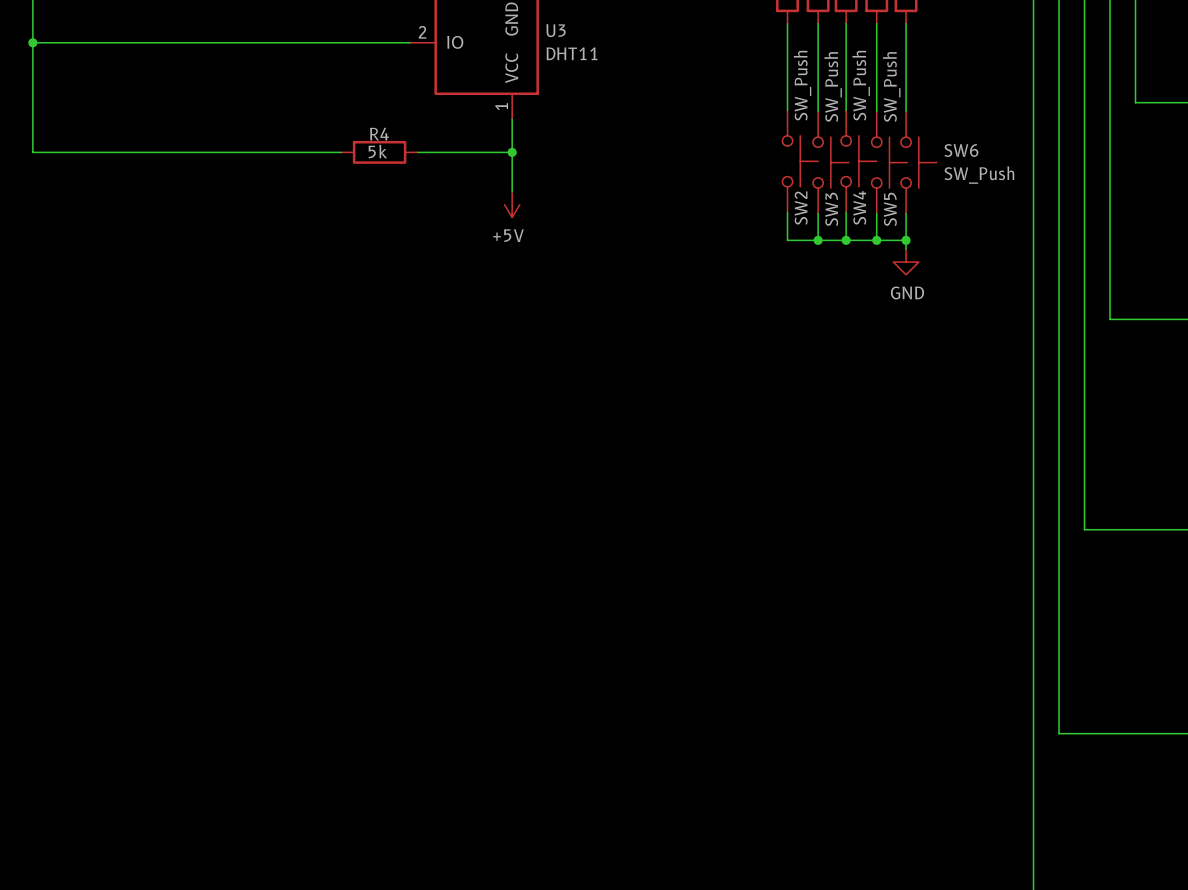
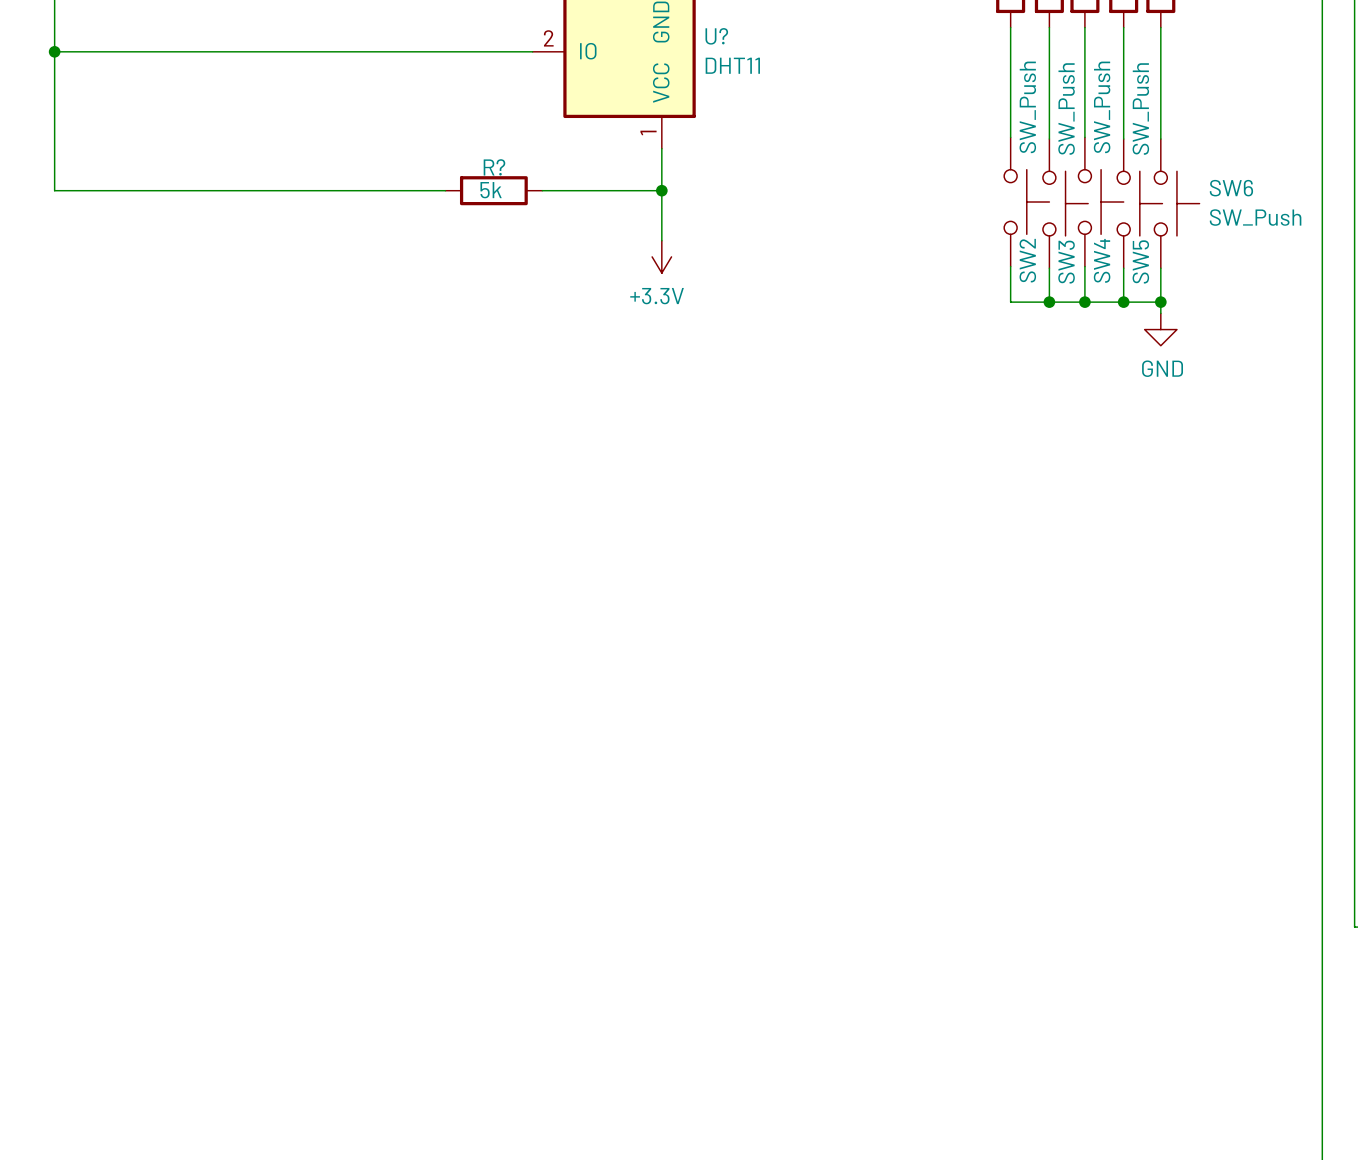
U3 name: U3 (556, 30) -> U? (716, 36)
R4 name: R4 (379, 134) -> R? (494, 167)
power symbol: +5V (512, 204) -> +3.3V (661, 256)

